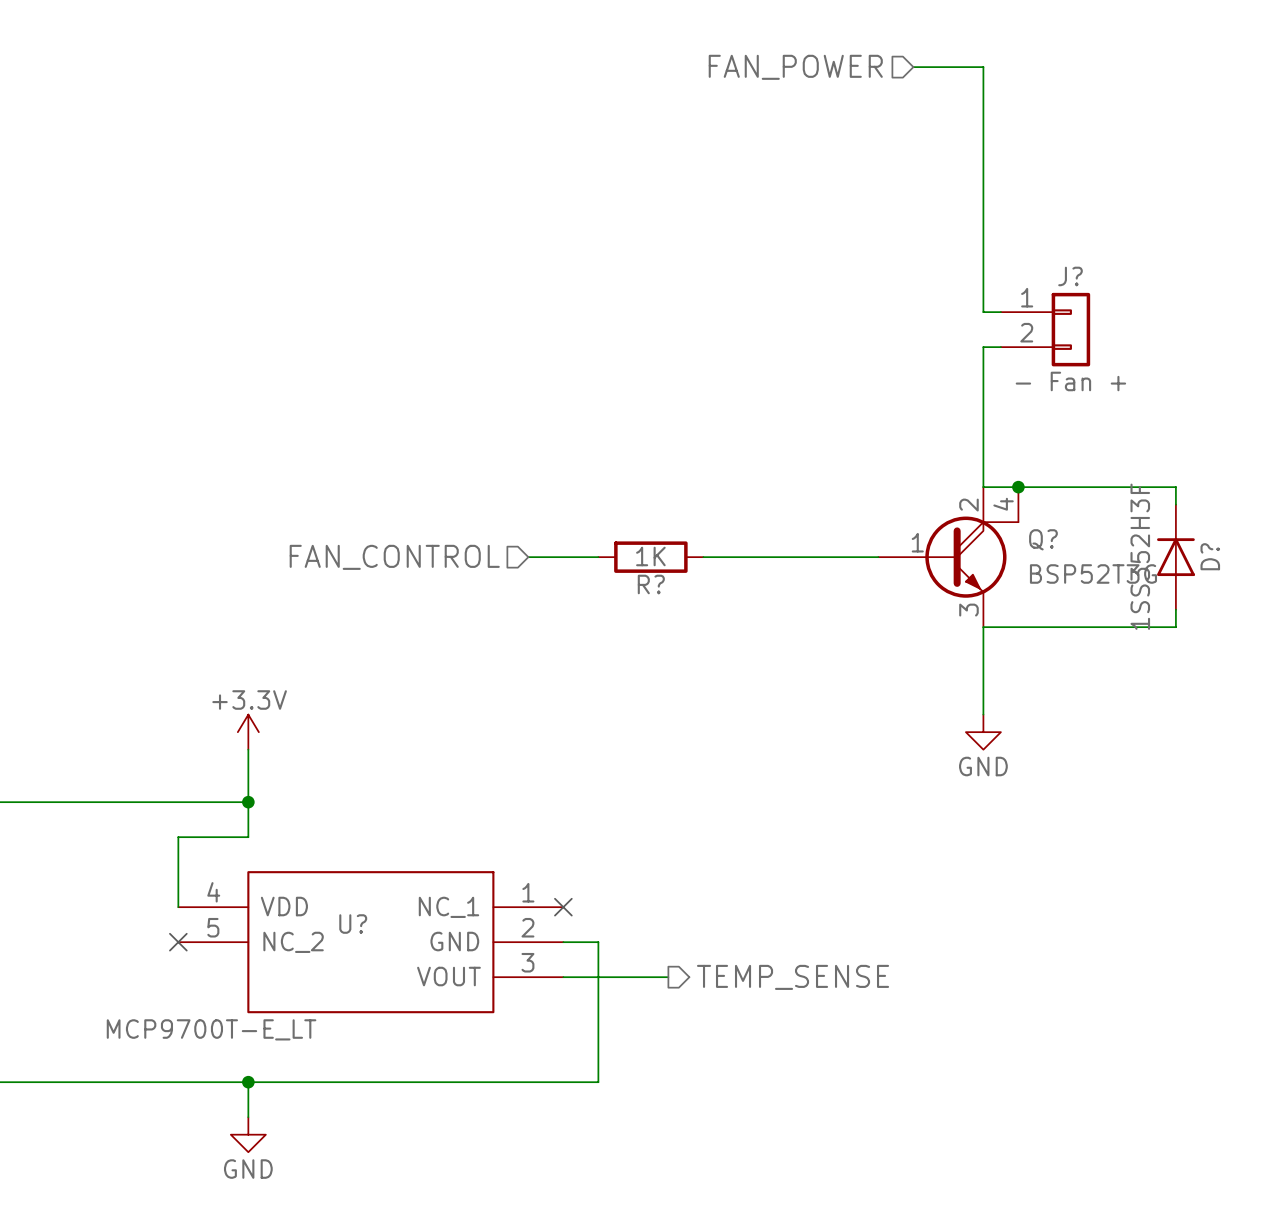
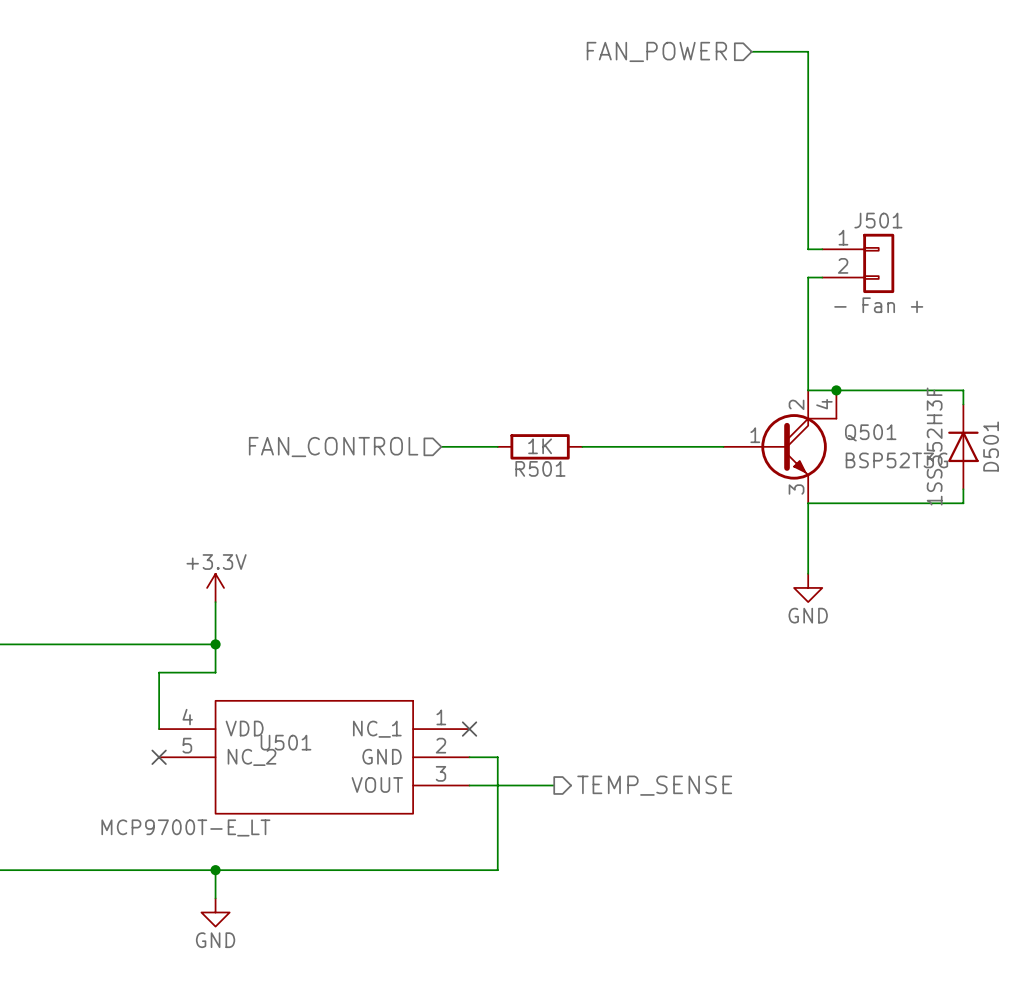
J? name: J? (1070, 276) -> J501 (878, 220)
Q? name: Q? (1043, 539) -> Q501 (870, 432)
D? name: D? (1210, 556) -> D501 (991, 446)
R? name: R? (651, 584) -> R501 (540, 468)
U? name: U? (353, 924) -> U501 (286, 742)

